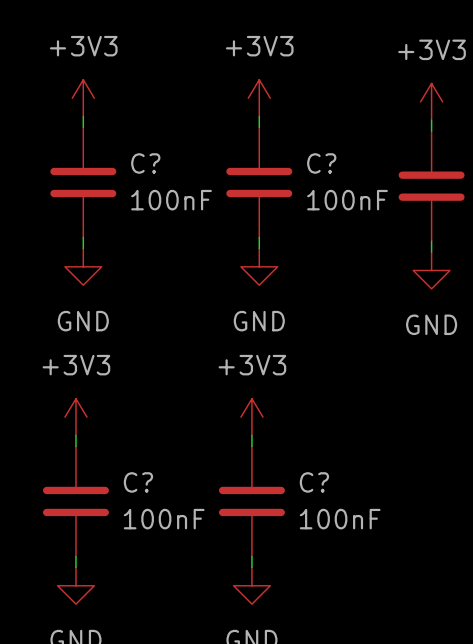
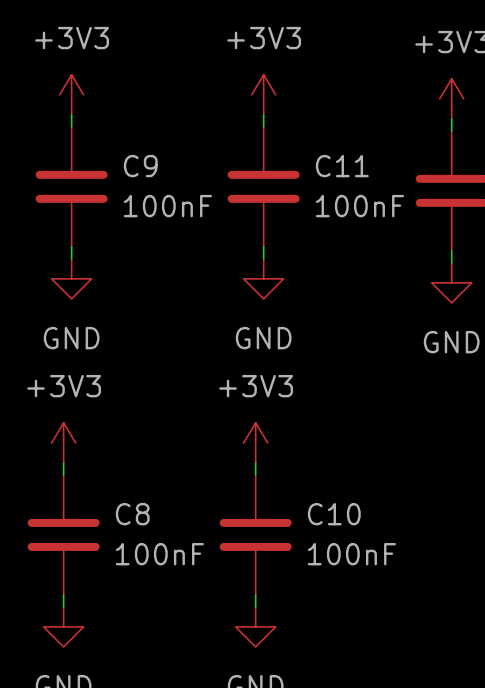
C? name: C? (145, 163) -> C9 (140, 166)
C? name: C? (321, 163) -> C11 (342, 166)
C? name: C? (138, 482) -> C8 (132, 514)
C? name: C? (314, 482) -> C10 (334, 514)

